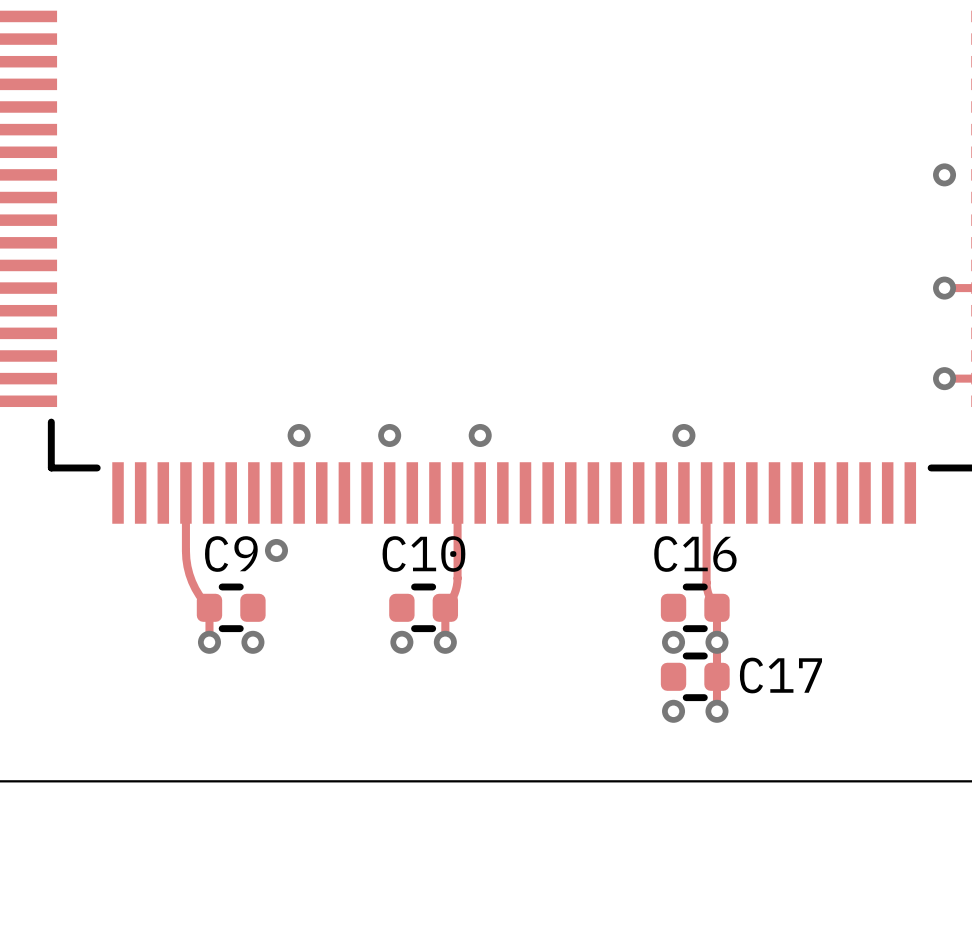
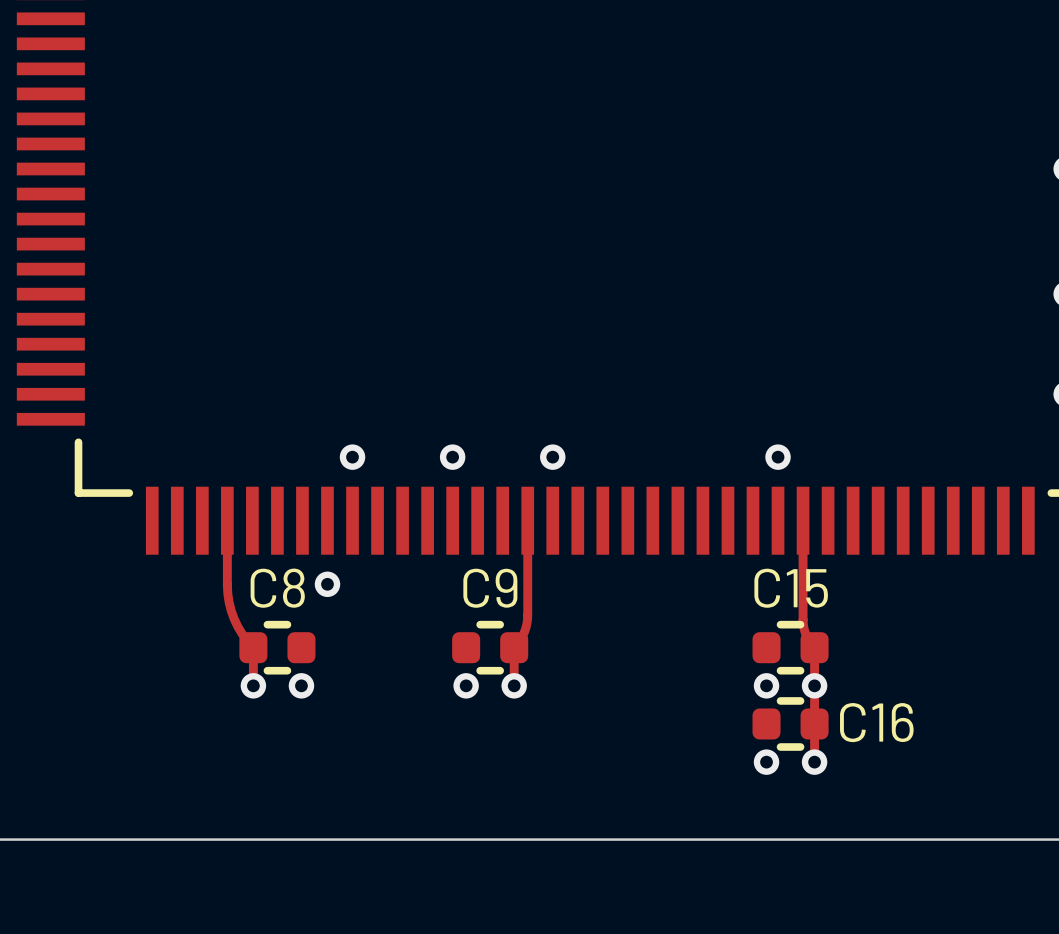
C9 name: C9 (231, 554) -> C8 (277, 588)
C10 name: C10 (423, 554) -> C9 (490, 588)
C16 name: C16 (695, 554) -> C15 (791, 588)
C17 name: C17 (780, 675) -> C16 (876, 722)

